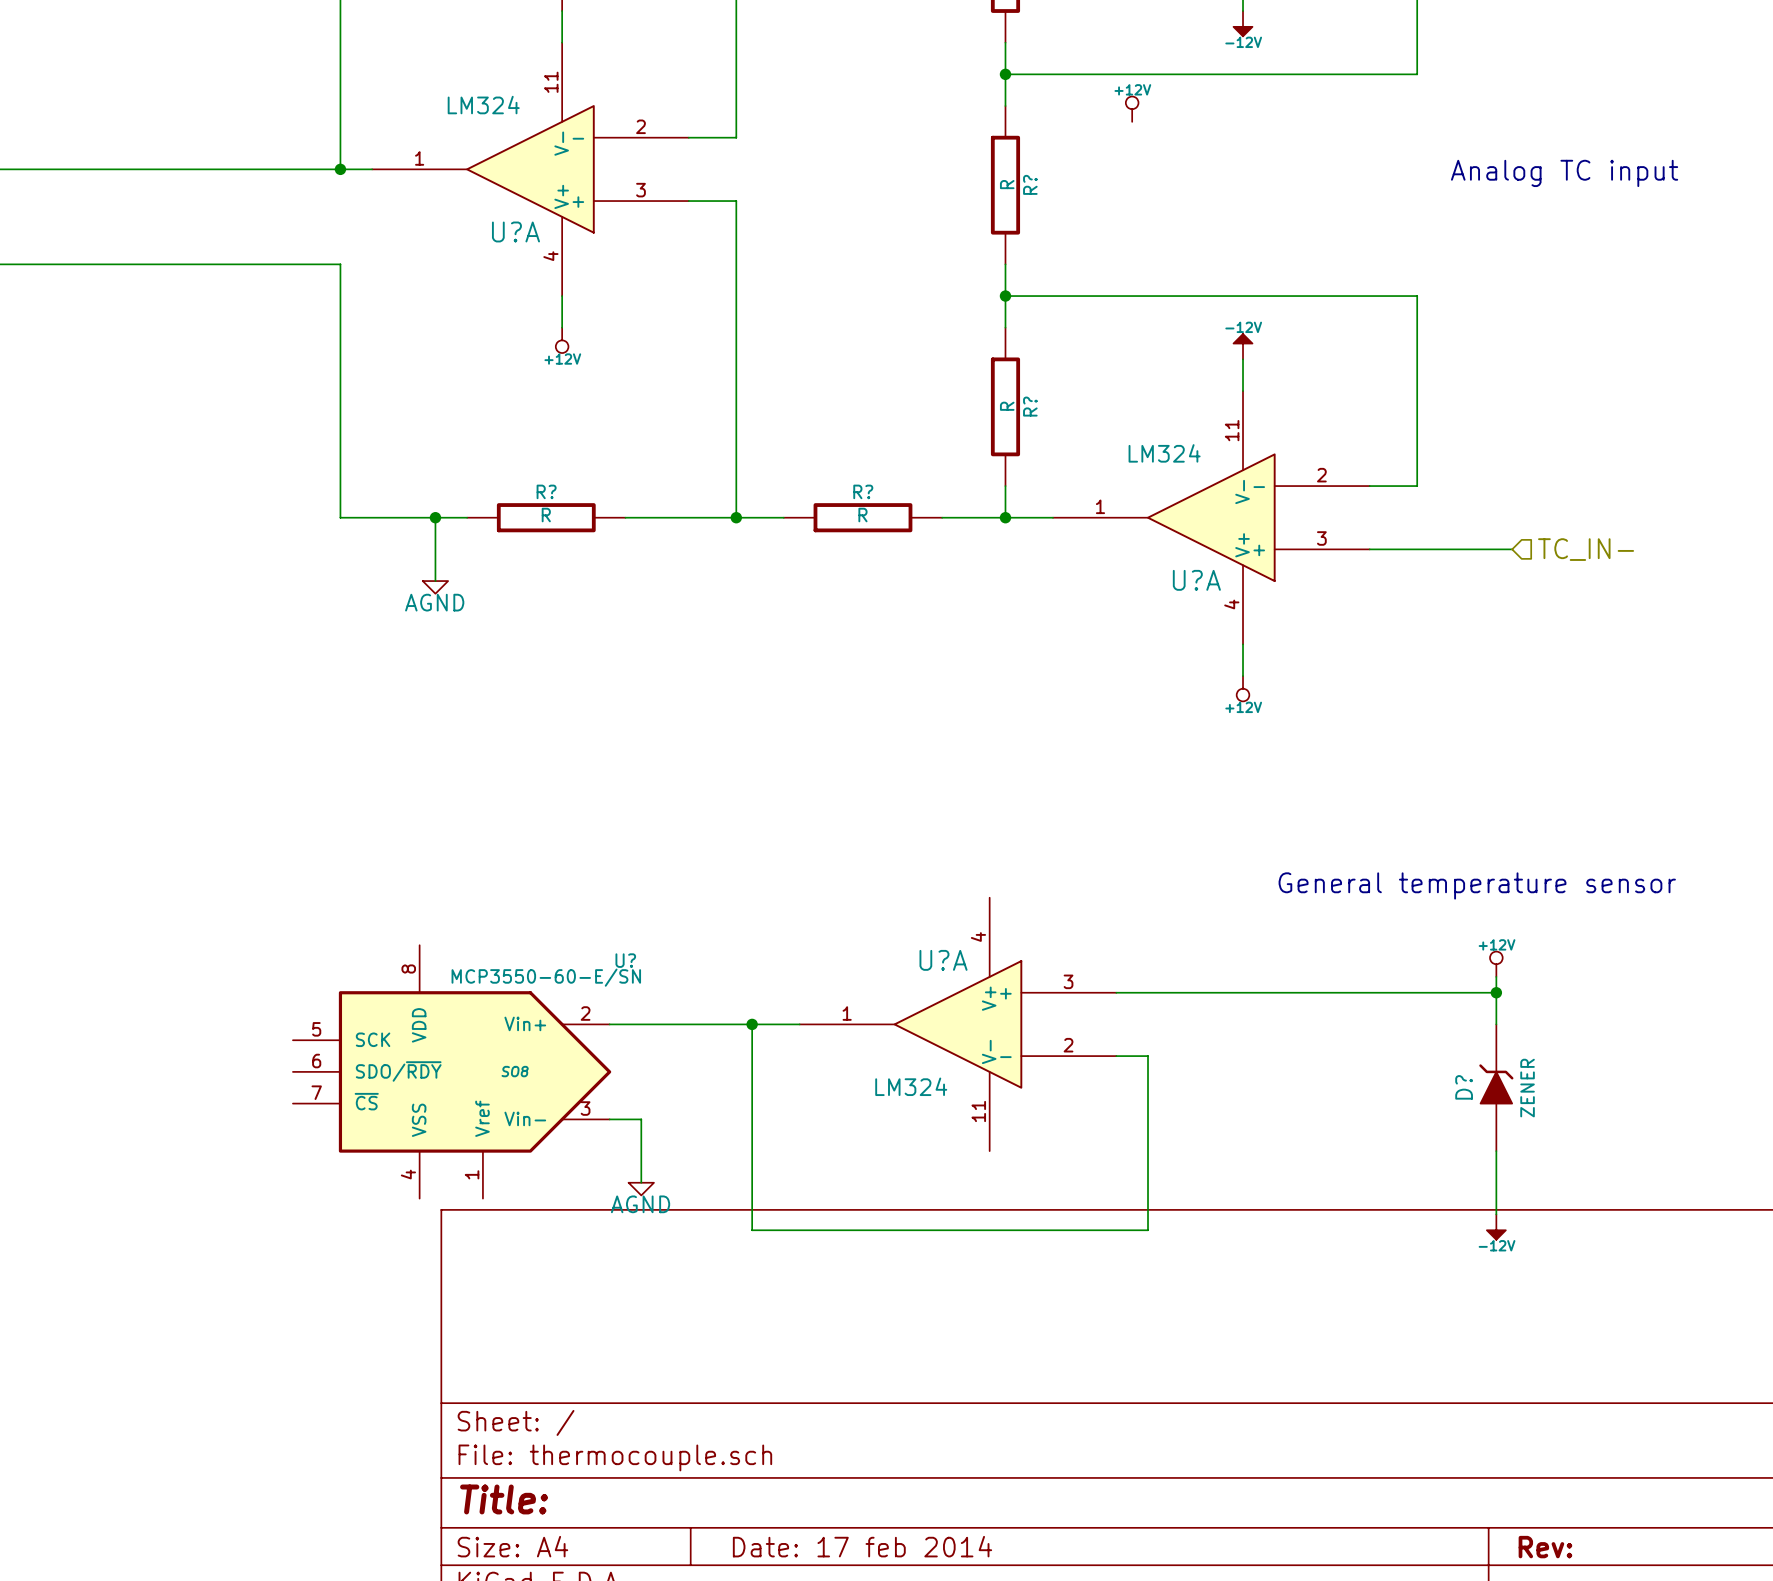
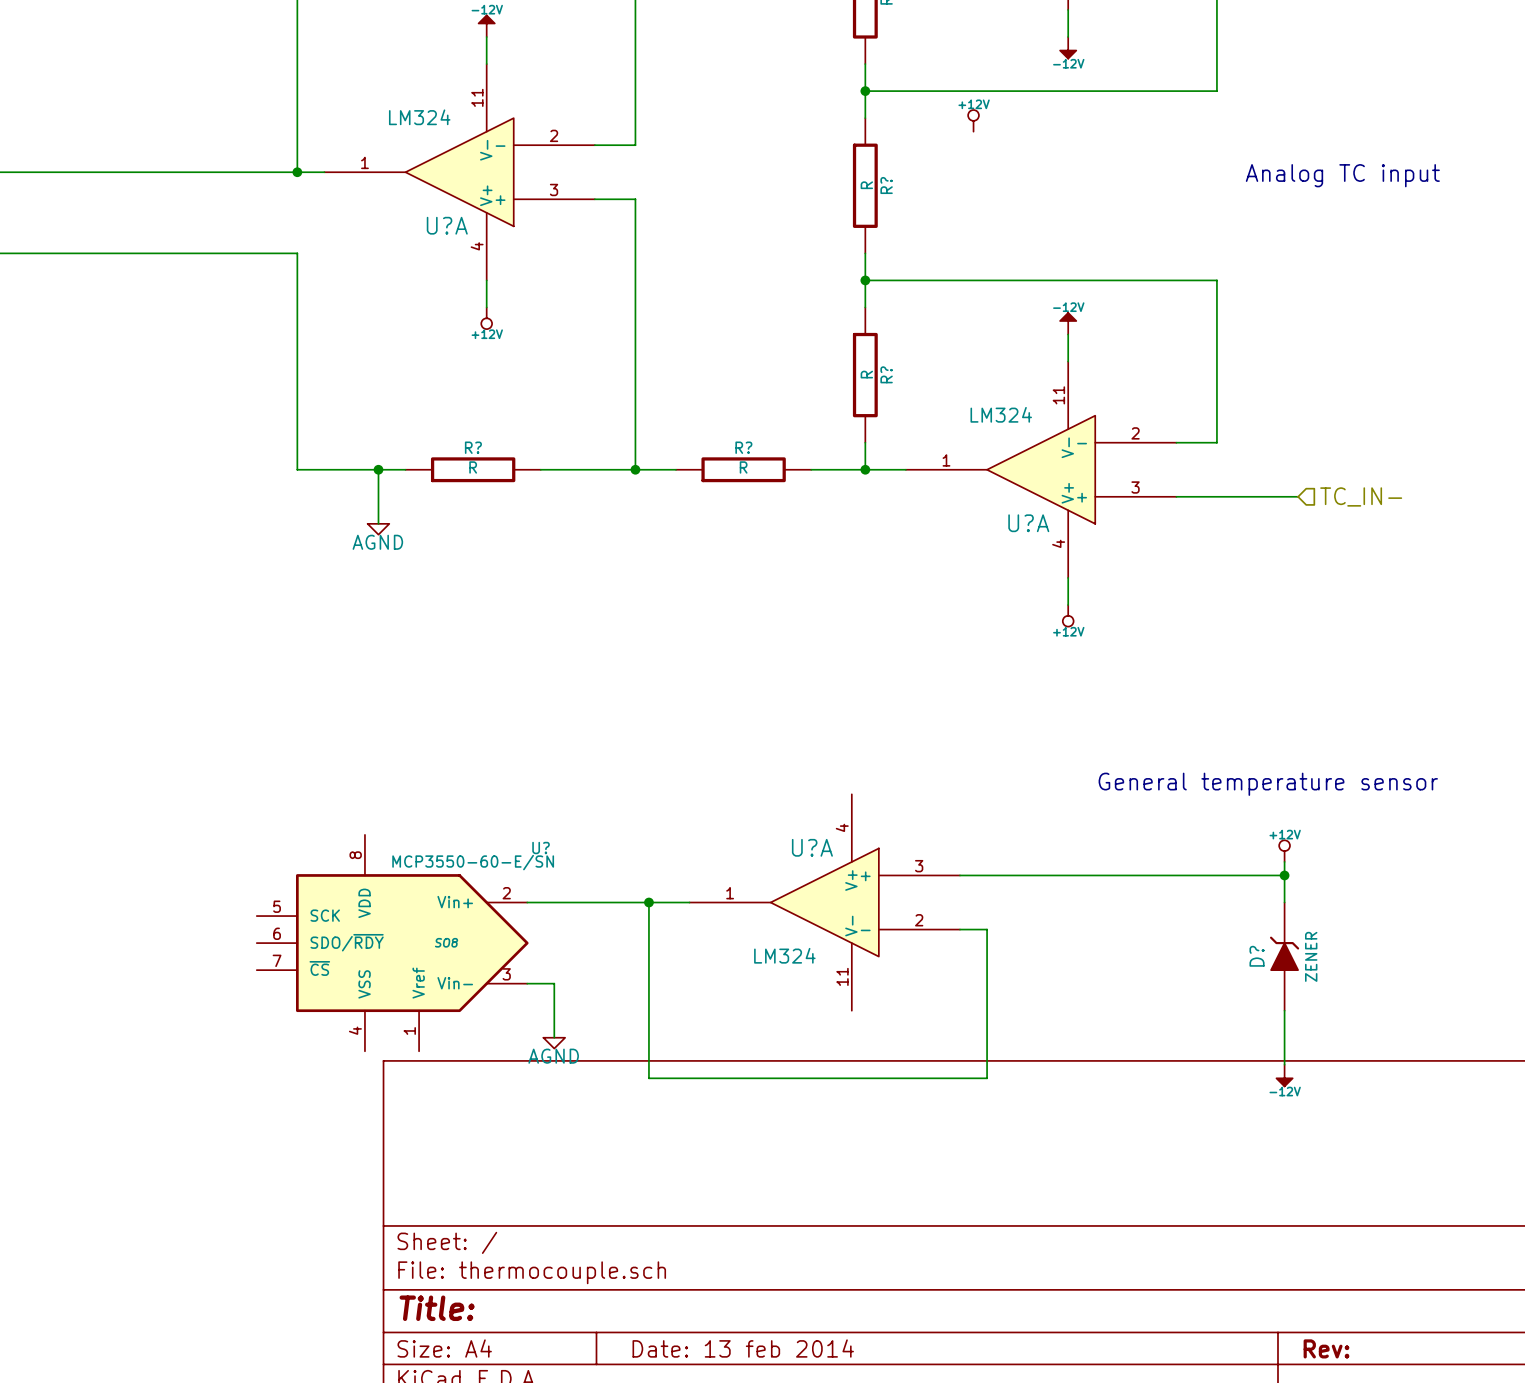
title block: Date: 17 feb 2014 (862, 1546) -> Date: 13 feb 2014 (743, 1348)

